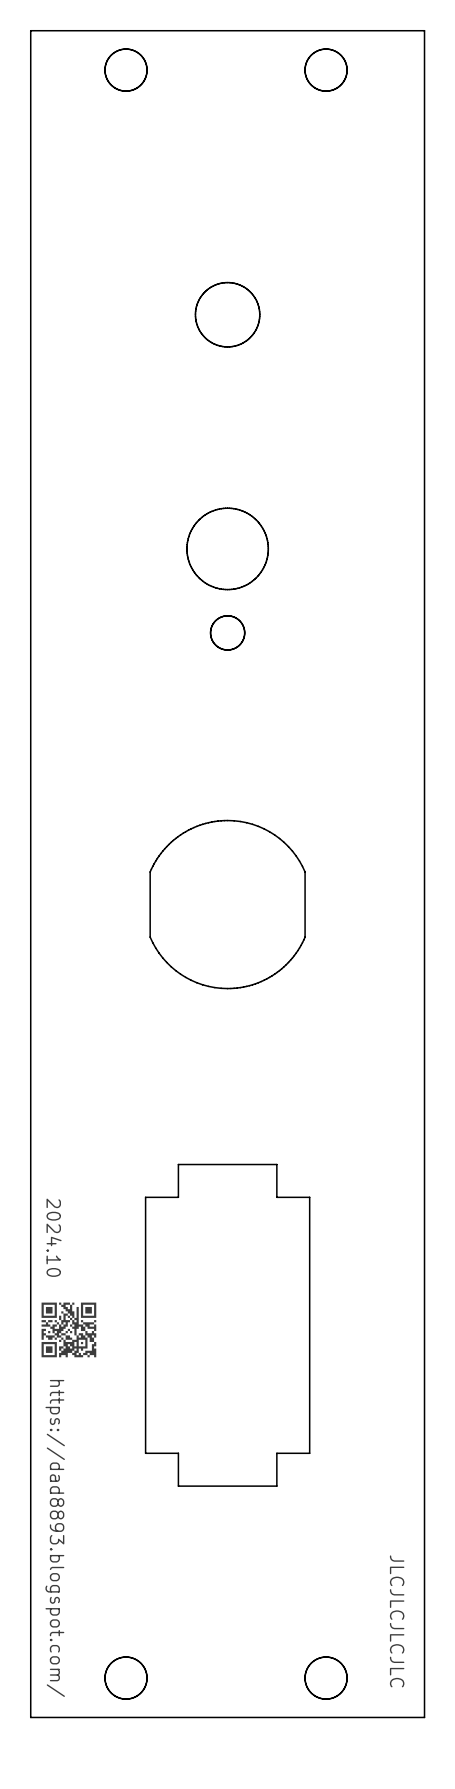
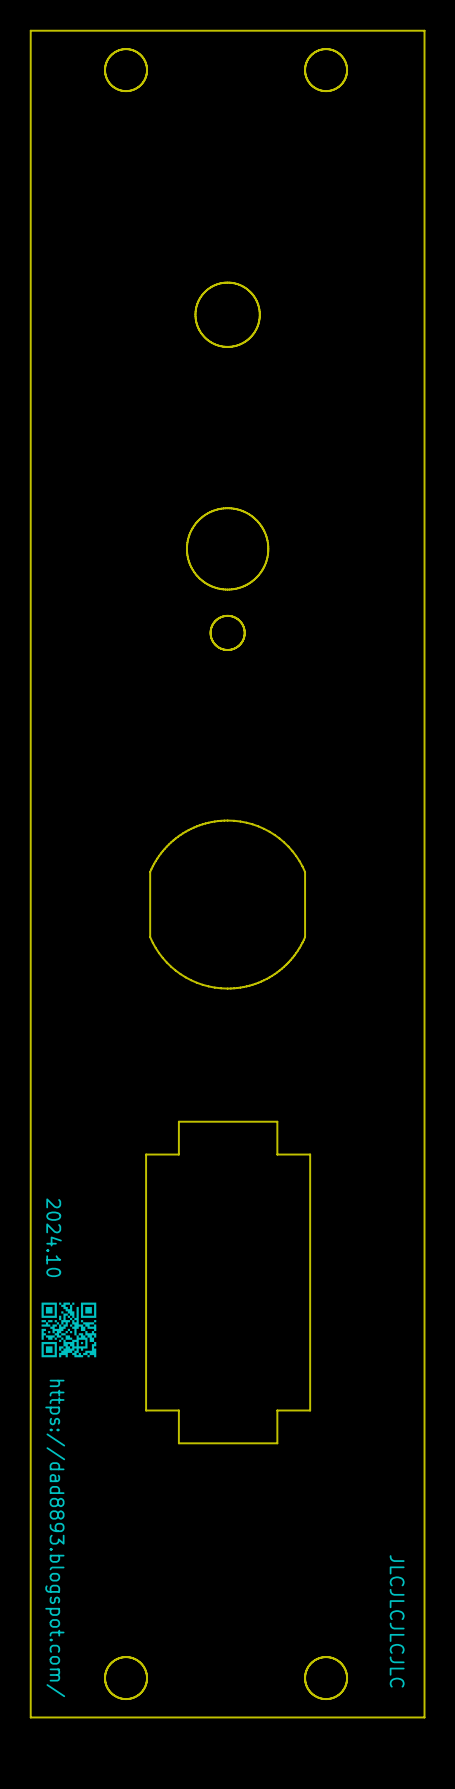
board edge: (276, 1164) (276, 1197) (309, 1197) (309, 1453) (276, 1453) (276, 1486) (178, 1486) (178, 1453) (145, 1453) (145, 1197) (178, 1197) (178, 1164) (276, 1164) -> (277, 1121) (277, 1154) (310, 1154) (310, 1410) (277, 1410) (277, 1443) (178, 1443) (178, 1410) (146, 1410) (146, 1154) (178, 1154) (178, 1121) (277, 1121)

